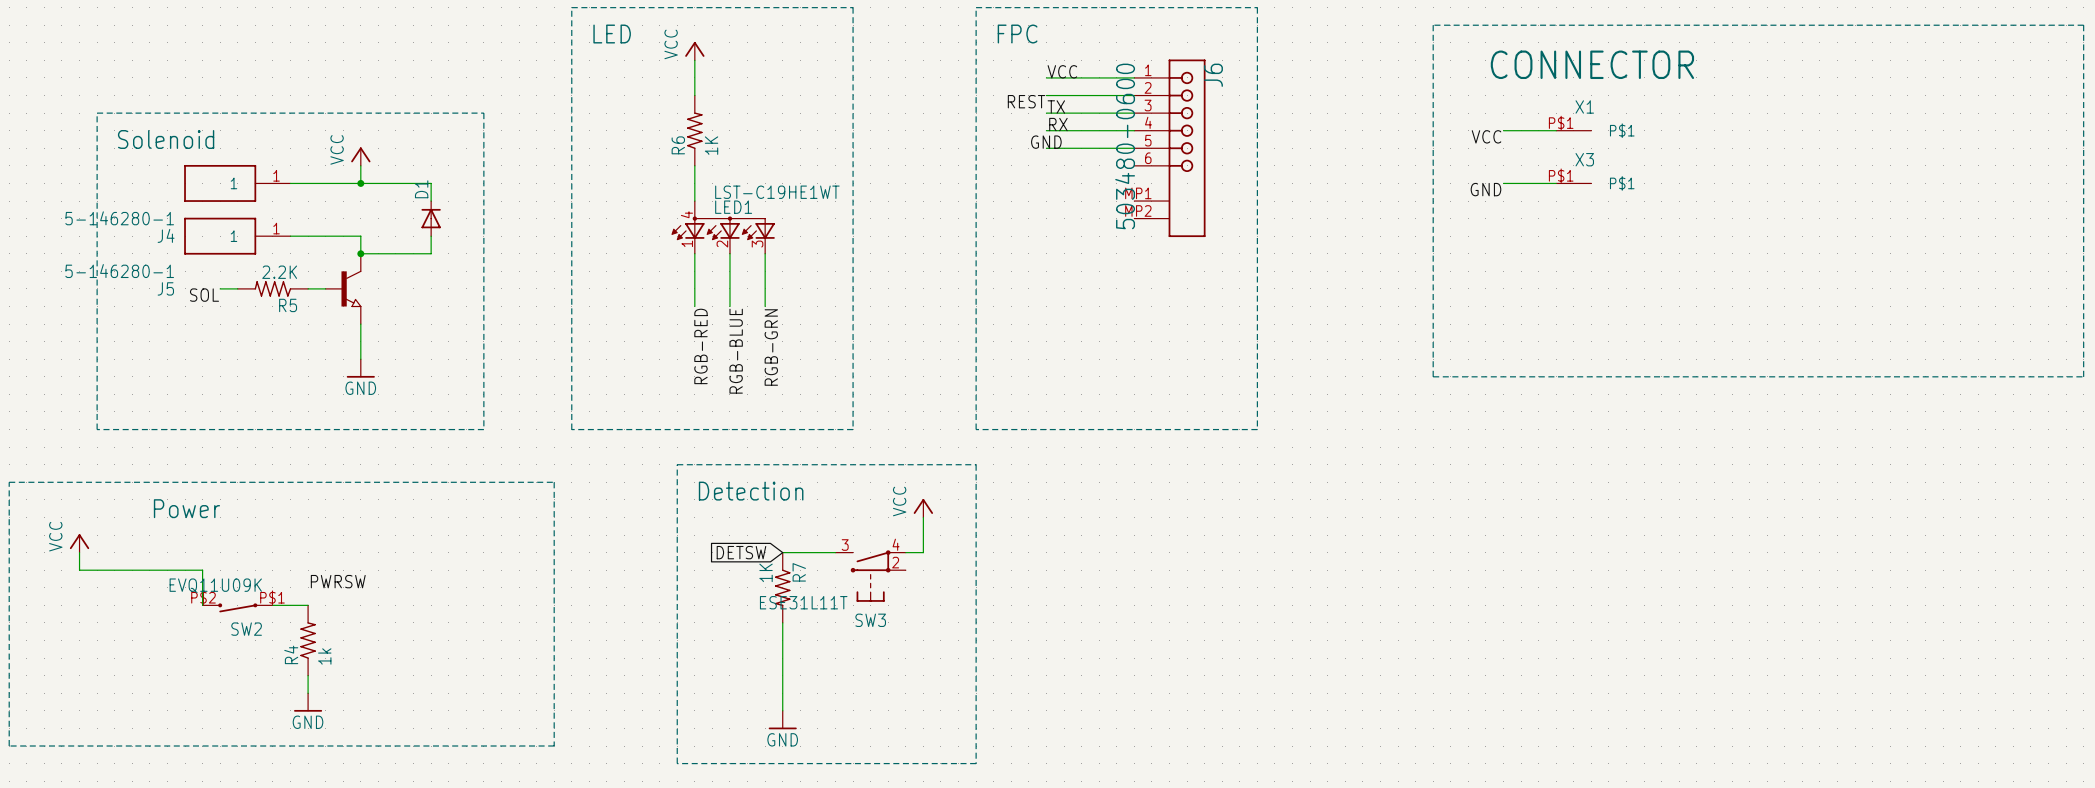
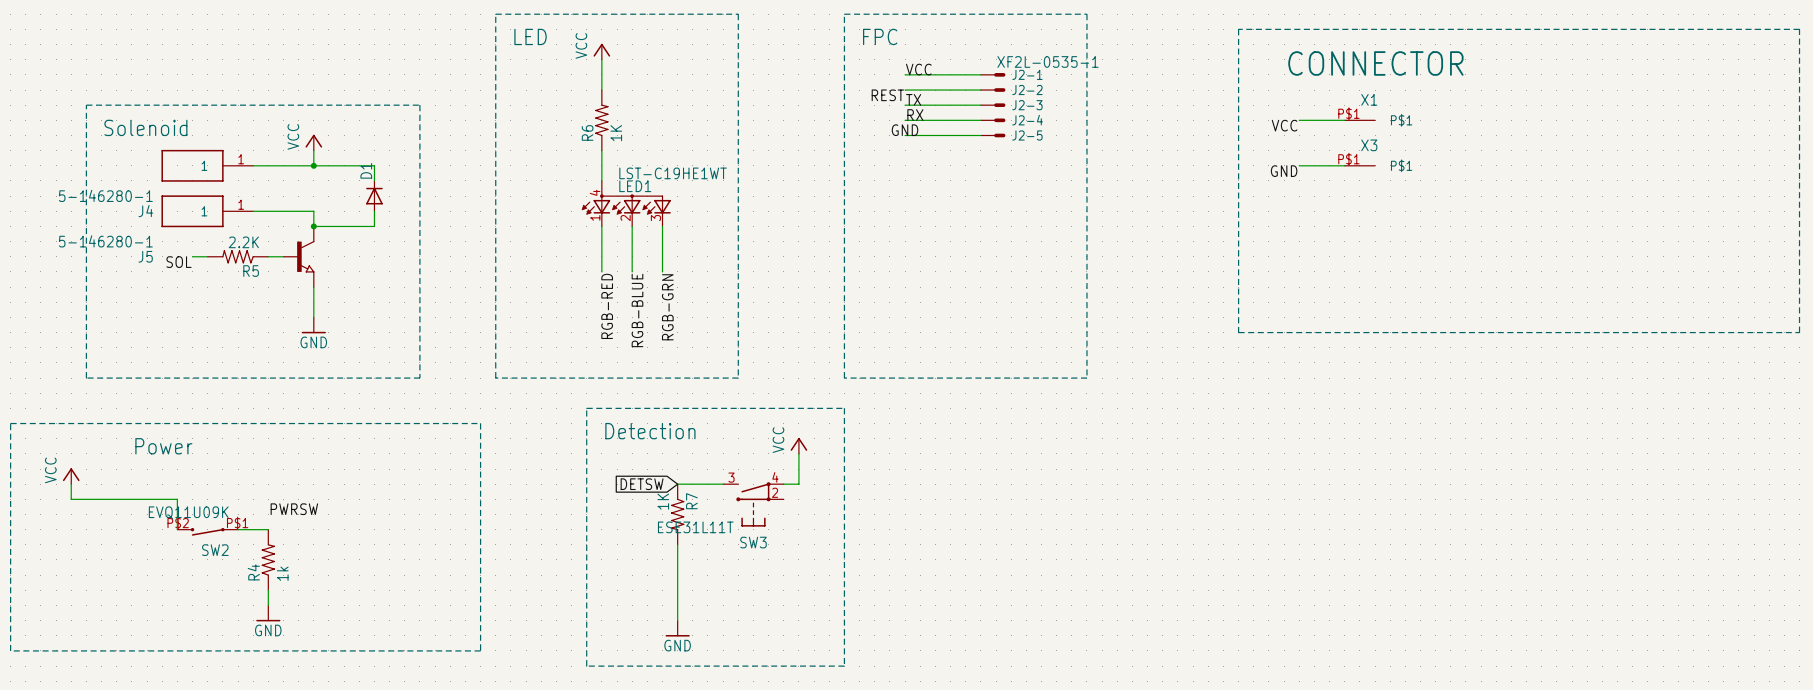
J2-1: none -> XF2L-0535-1 (993, 74)
J2-2: none -> (993, 90)
J2-3: none -> (993, 105)
J2-4: none -> (993, 120)
J2-5: none -> (993, 135)
J6: (1169, 148) -> none

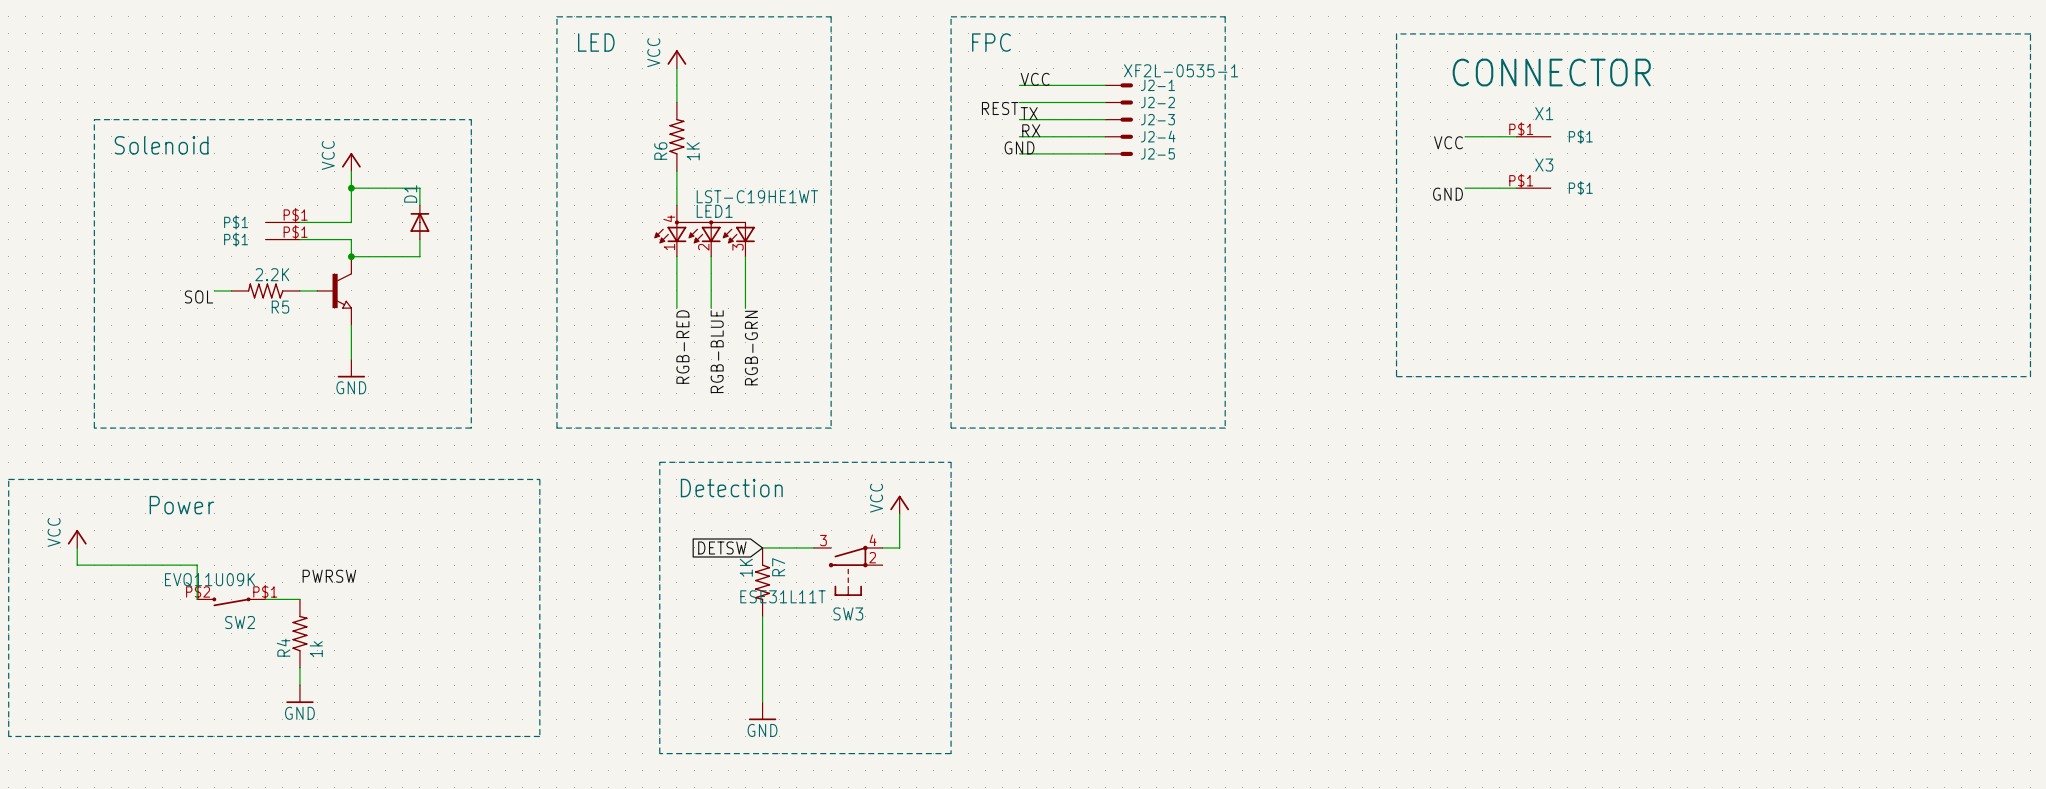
J4: 5-146280-1 (207, 165) -> none
wire: (253, 165) (313, 165) -> (299, 222) (351, 222) (351, 188)
part: none -> (282, 222)
J5: 5-146280-1 (207, 211) -> none
part: none -> (282, 239)

